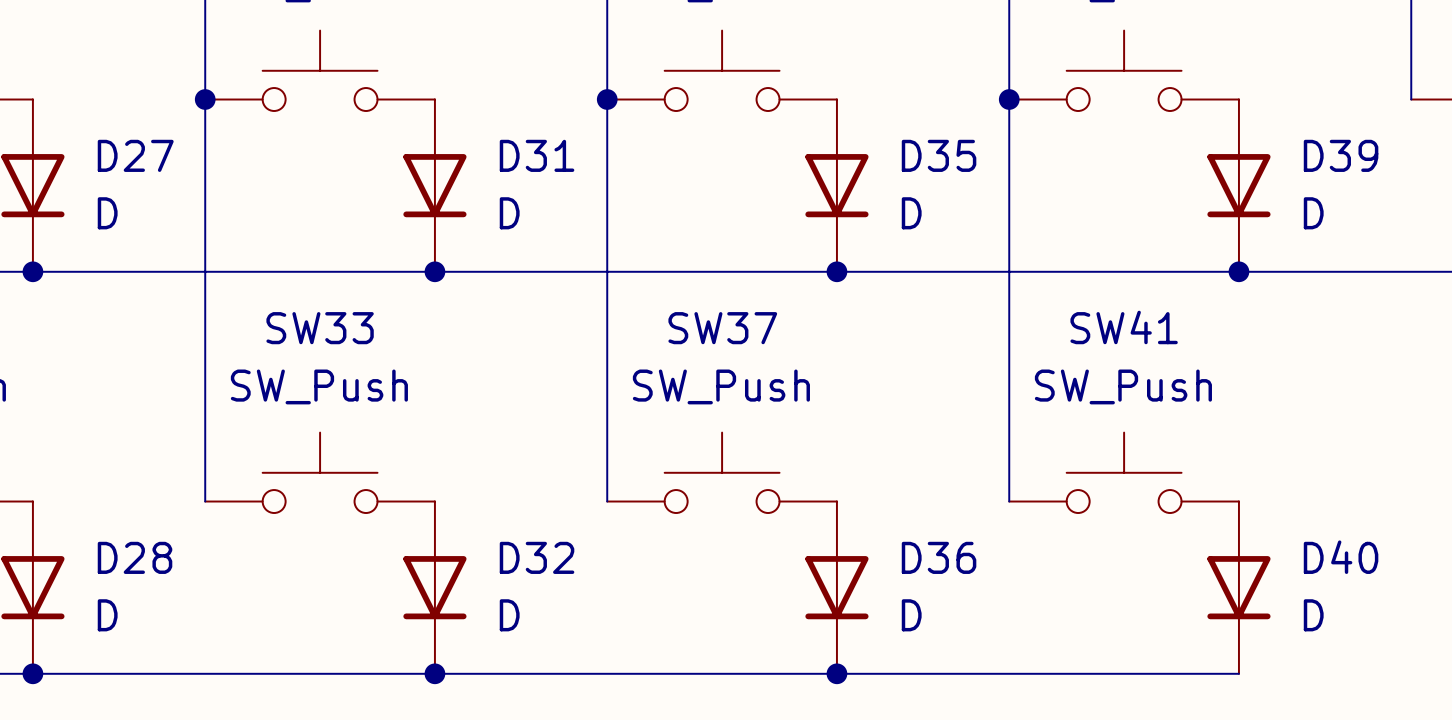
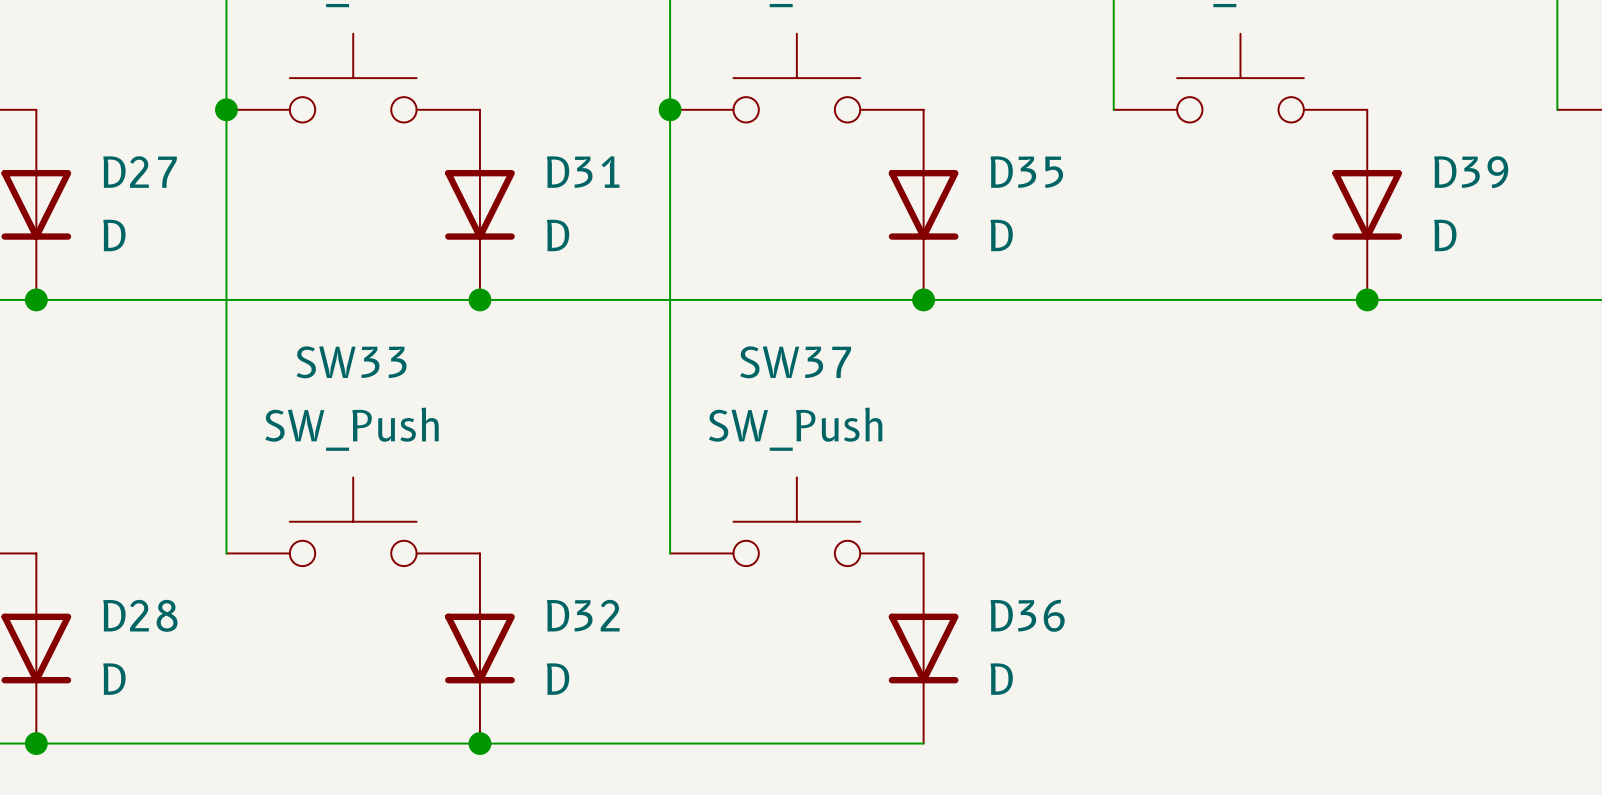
wire: (1009, 99) (1009, 501) -> none
junction: (1009, 99) -> none
SW41: SW_Push (1124, 472) -> none
D40: D (1238, 587) -> none
wire: (836, 673) (1238, 673) -> none
junction: (836, 673) -> none

